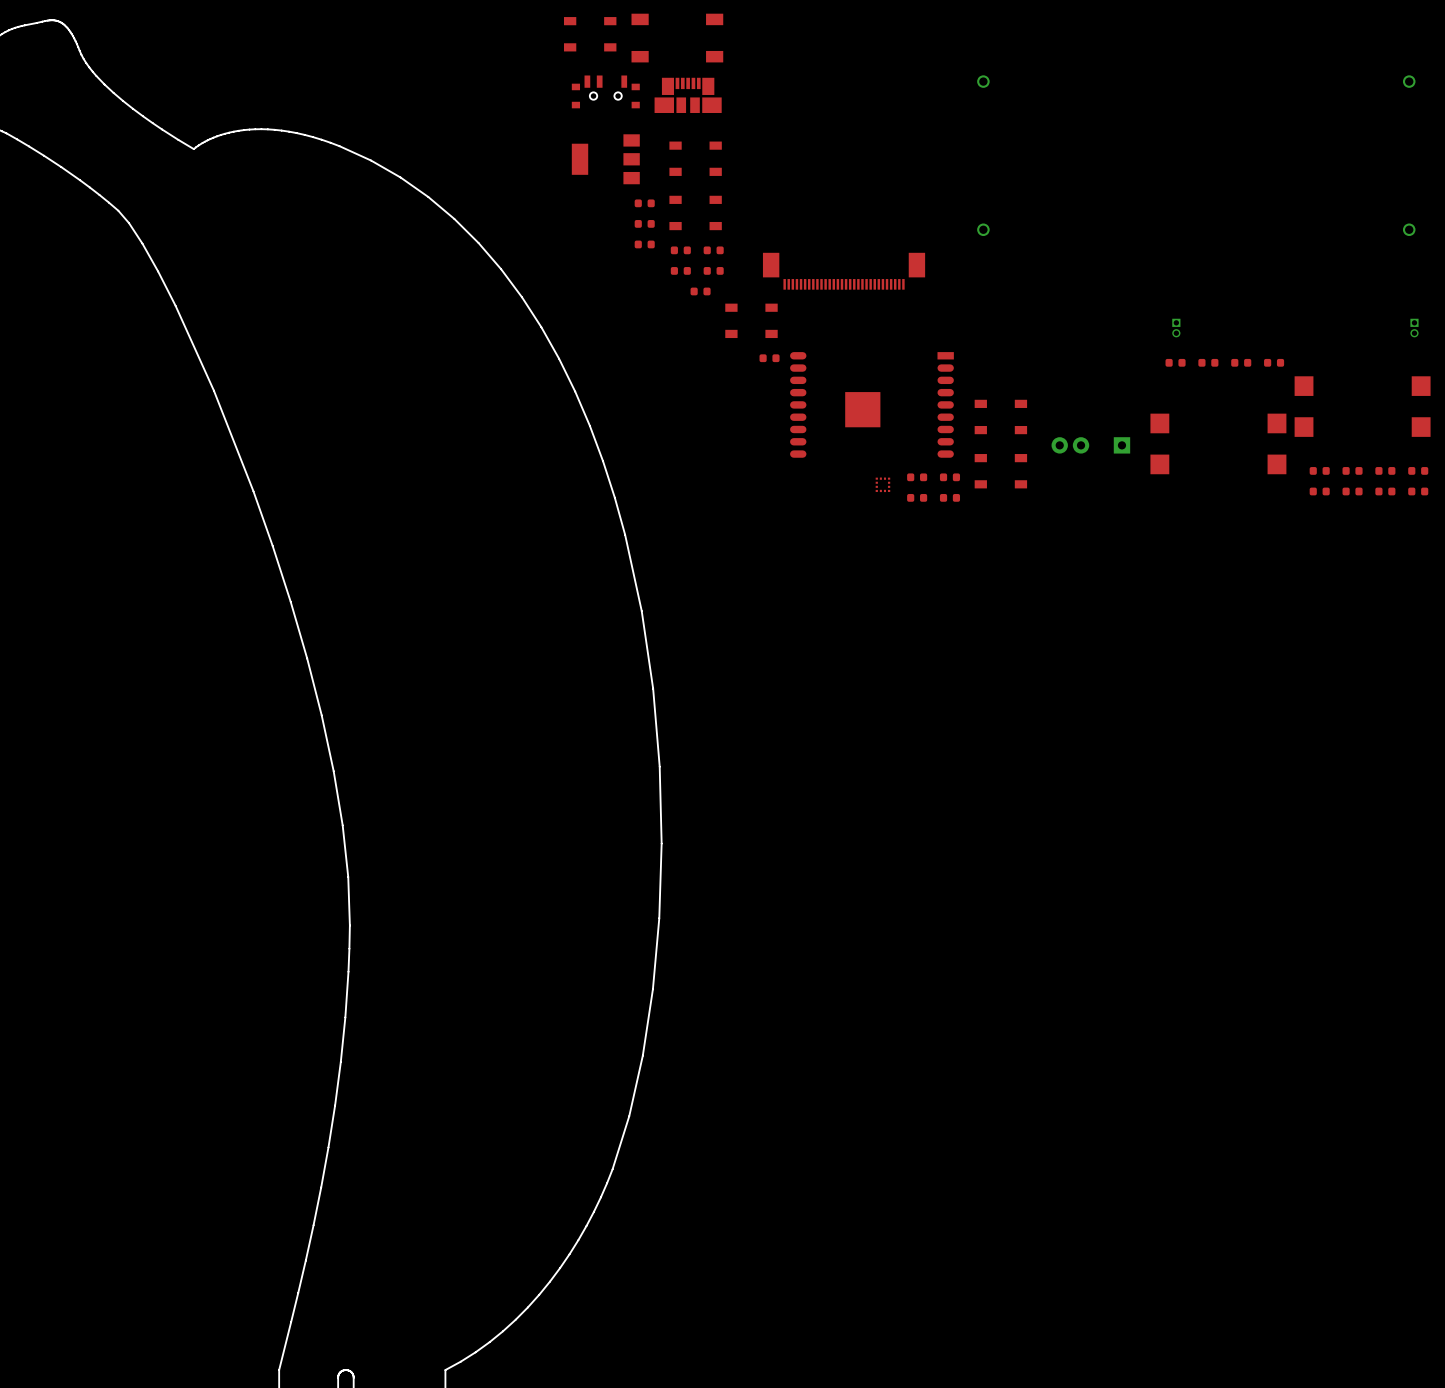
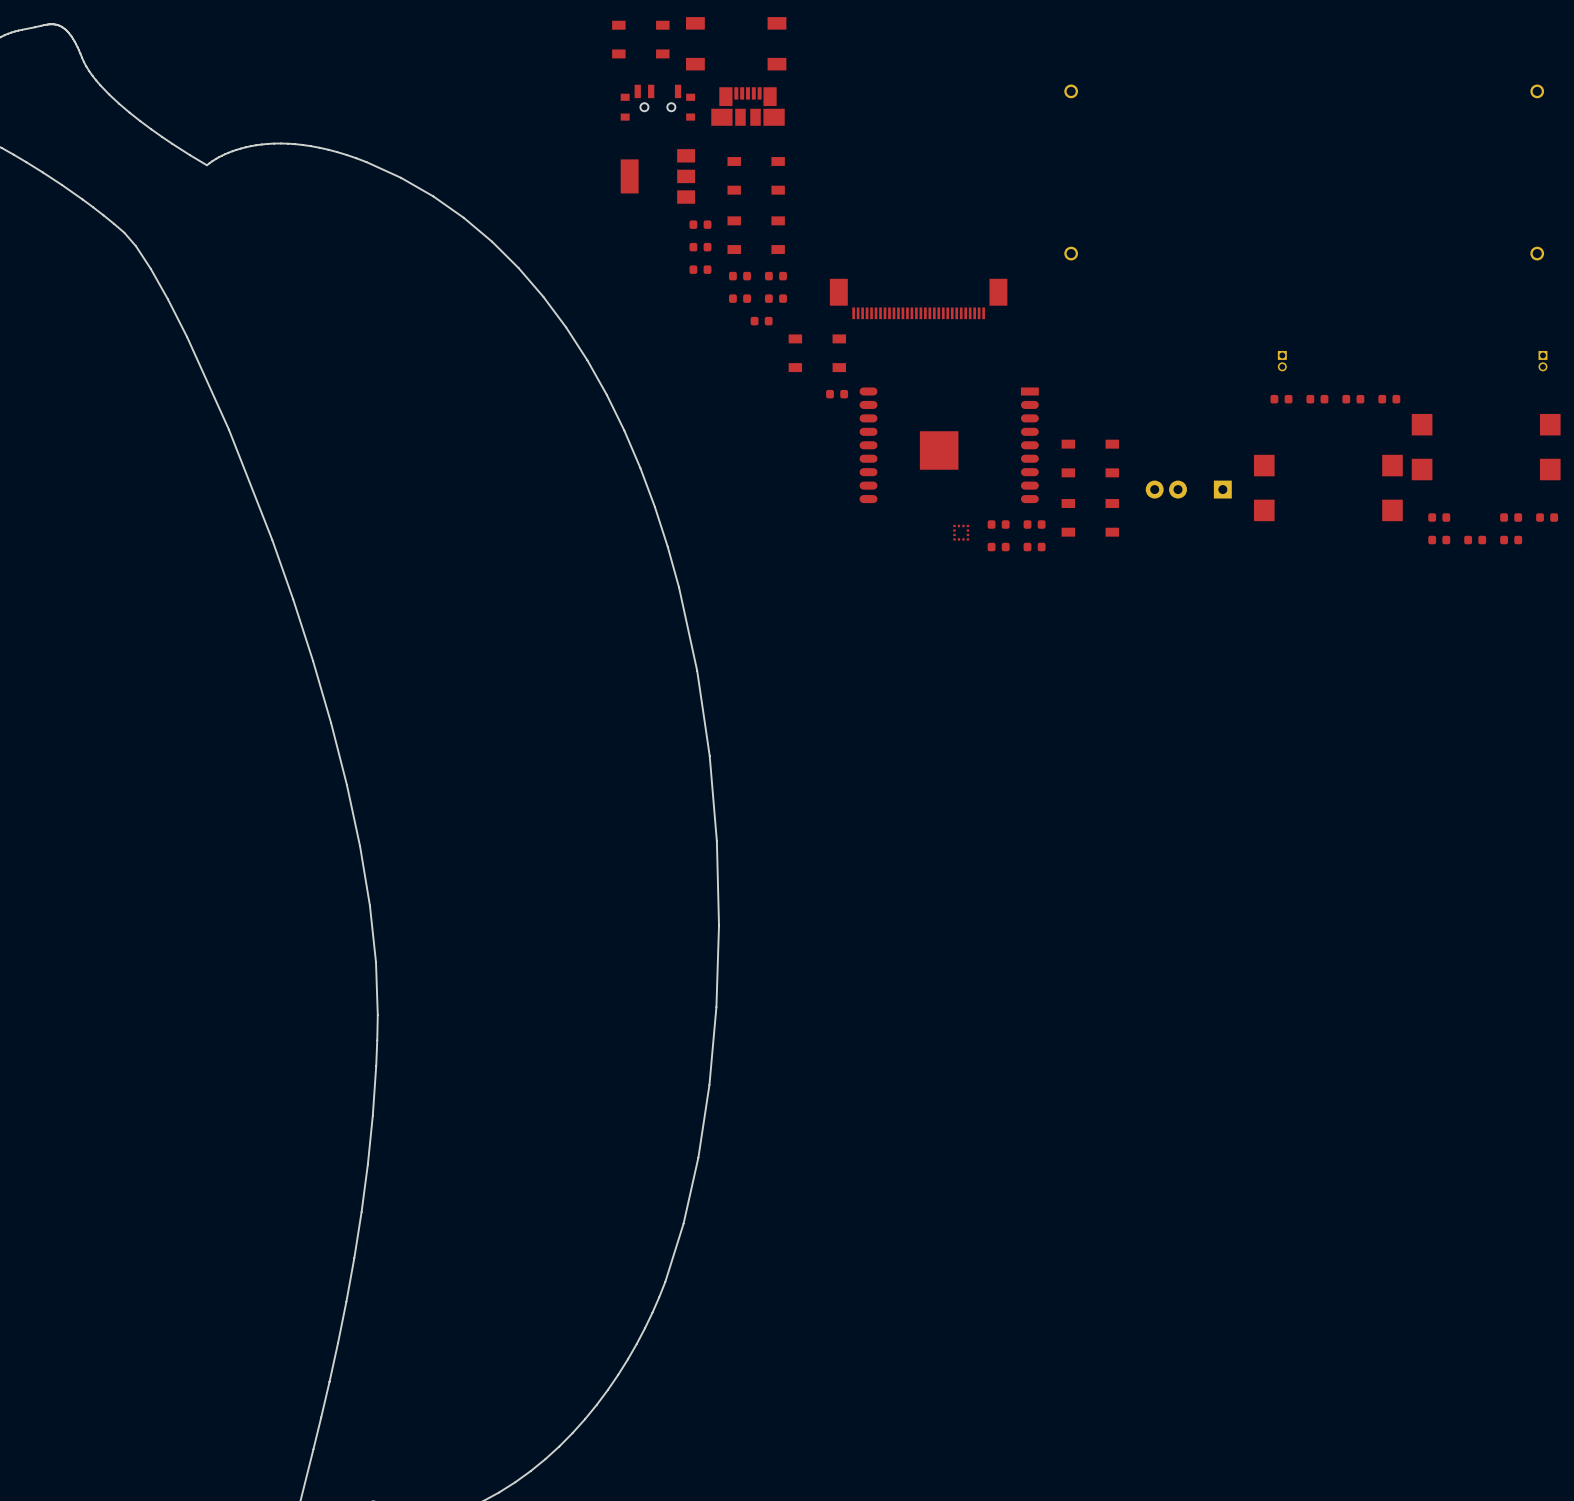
part: (1352, 470) -> none
part: (1418, 491) -> none

